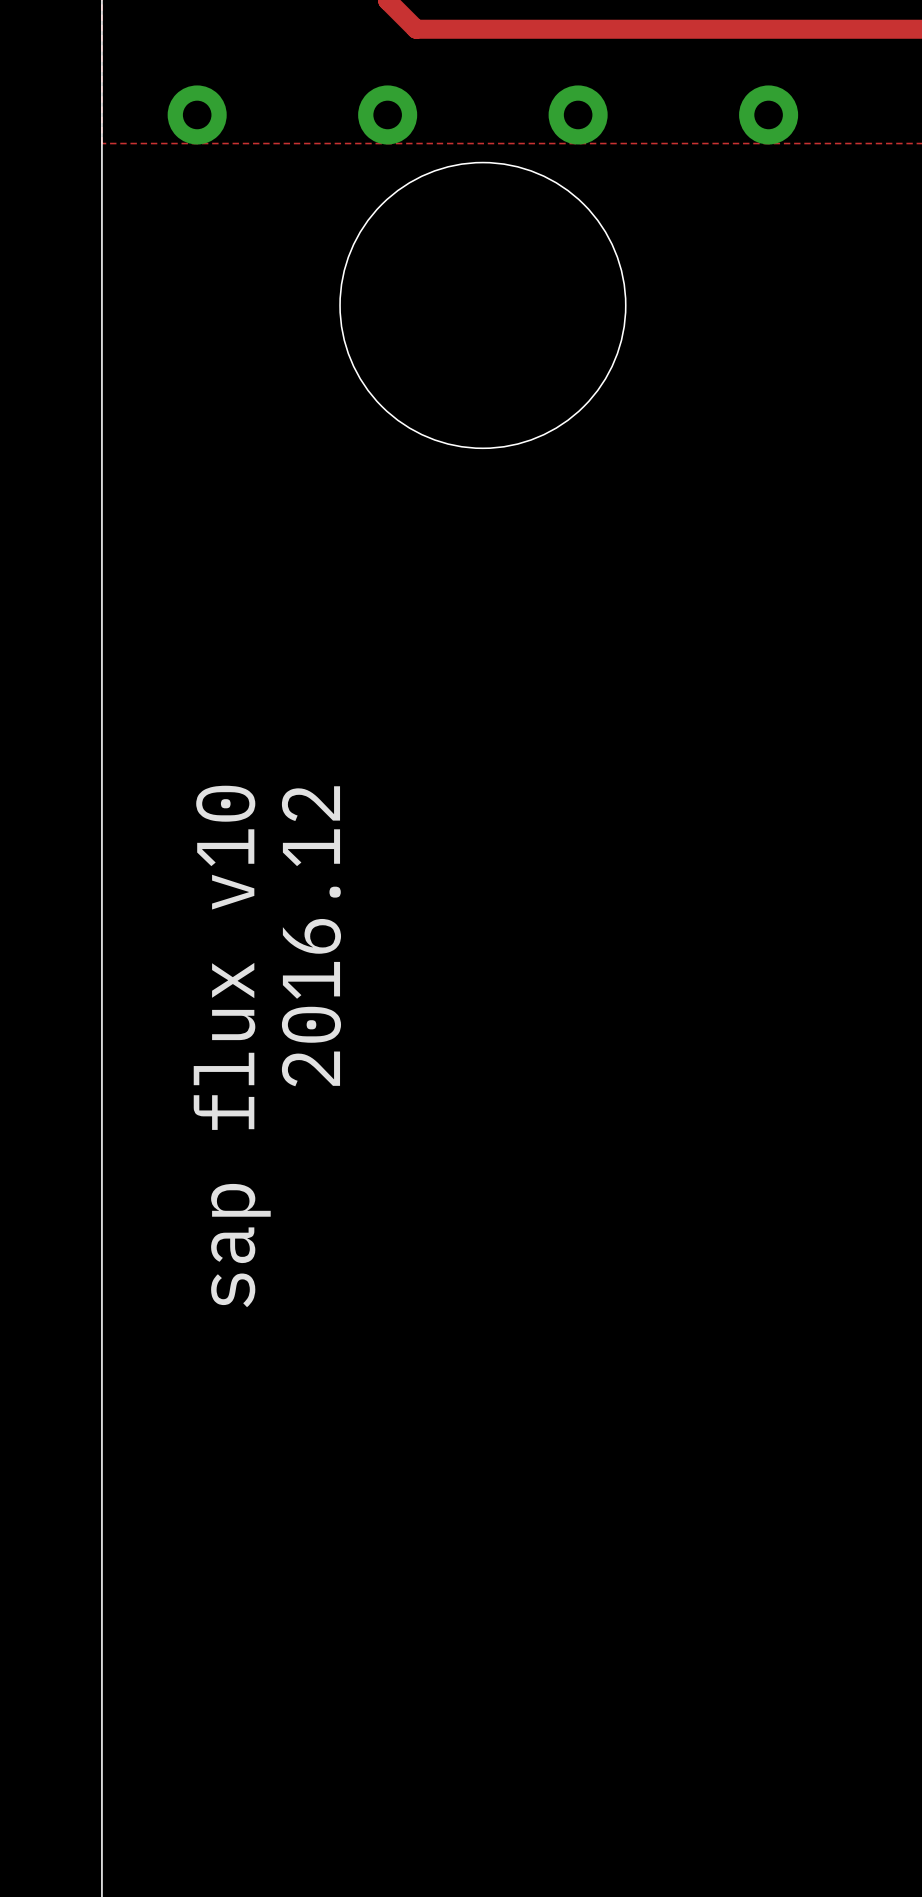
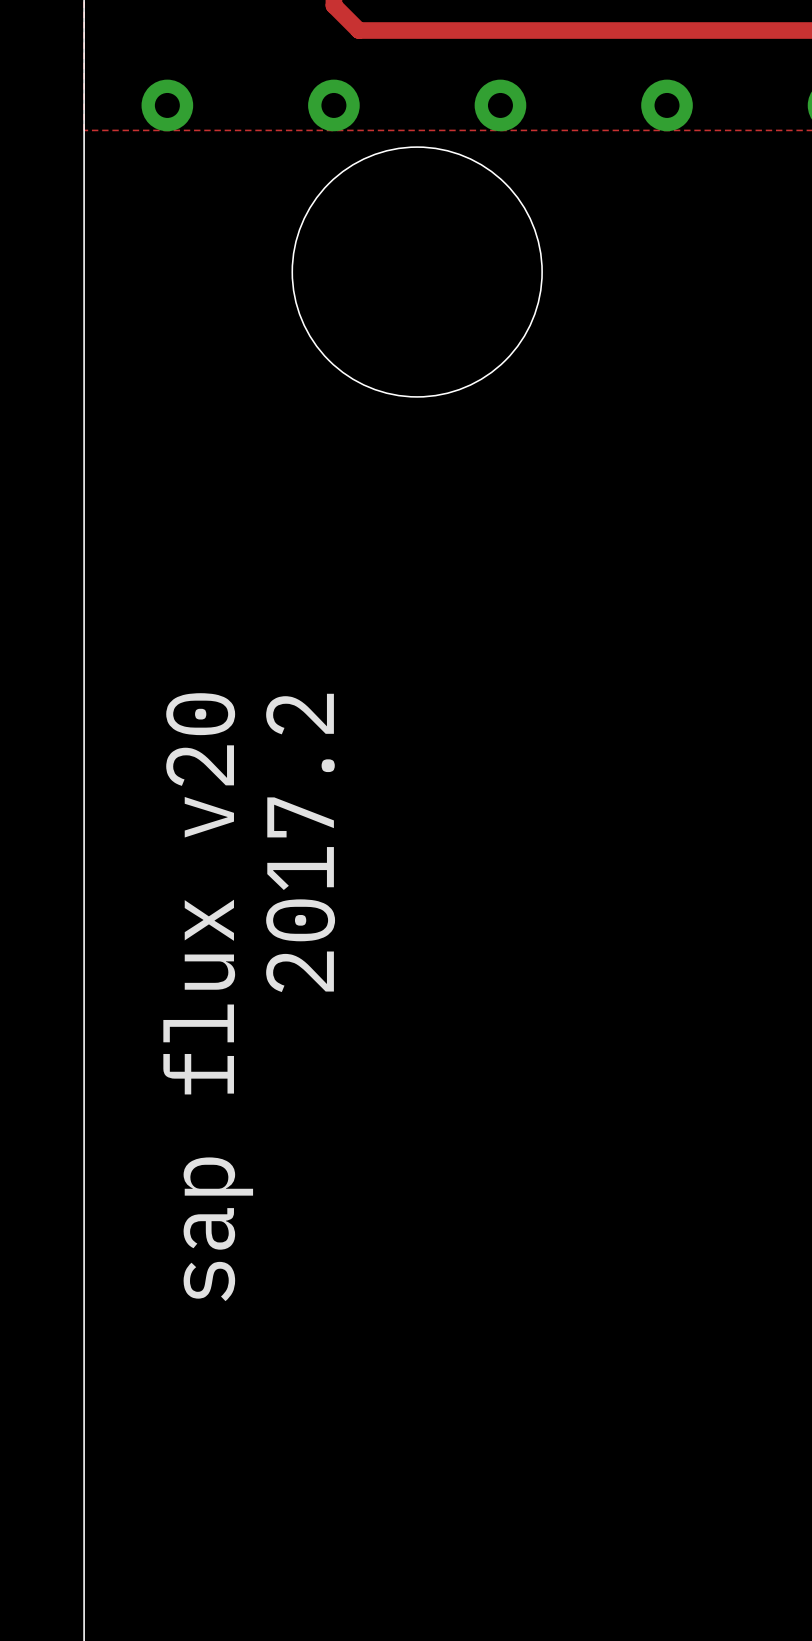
text: 2016.12 (311, 936) -> 2017.2 (300, 842)
text: sap flux v10 (232, 1046) -> sap flux v20 (208, 997)

